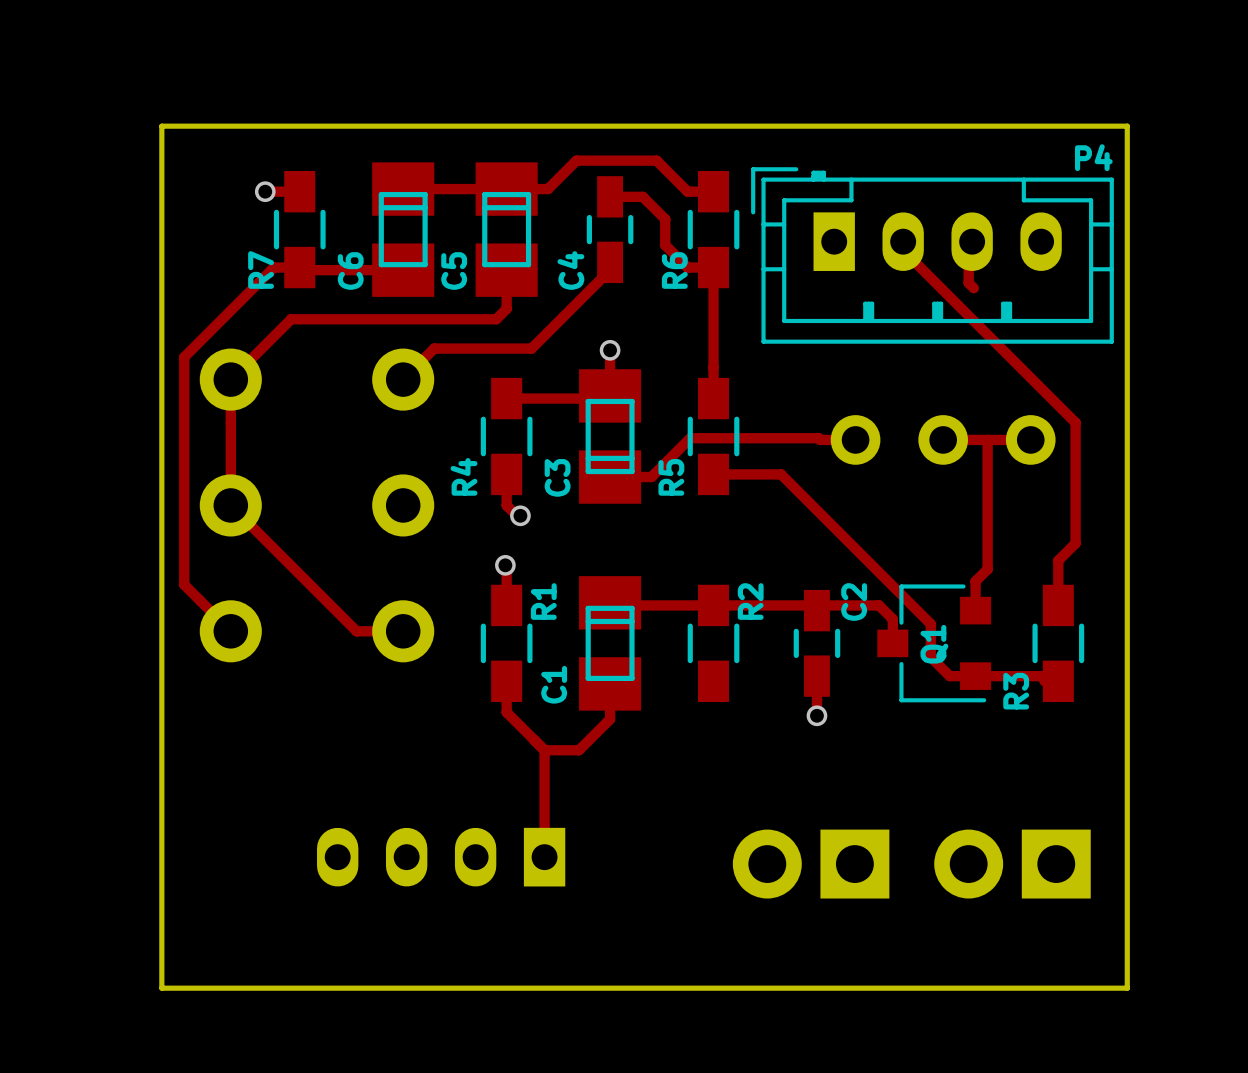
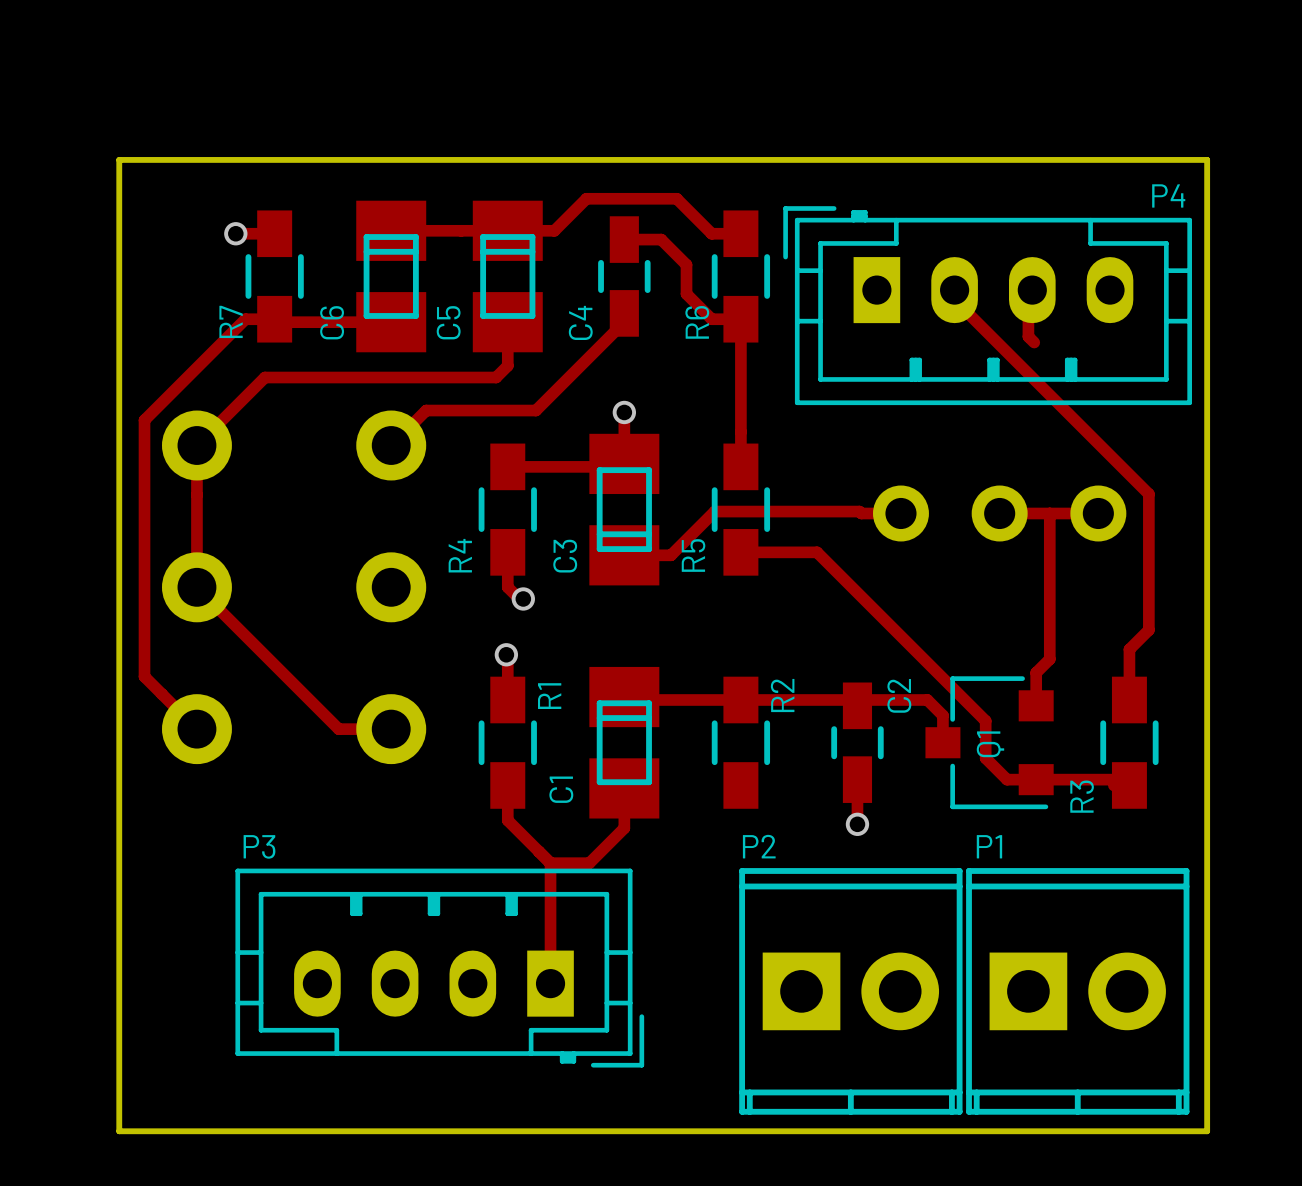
P3 side: bottom (441, 857) -> top (439, 968)
P2 side: bottom (811, 864) -> top (850, 991)
P1 side: bottom (1012, 864) -> top (1077, 991)

